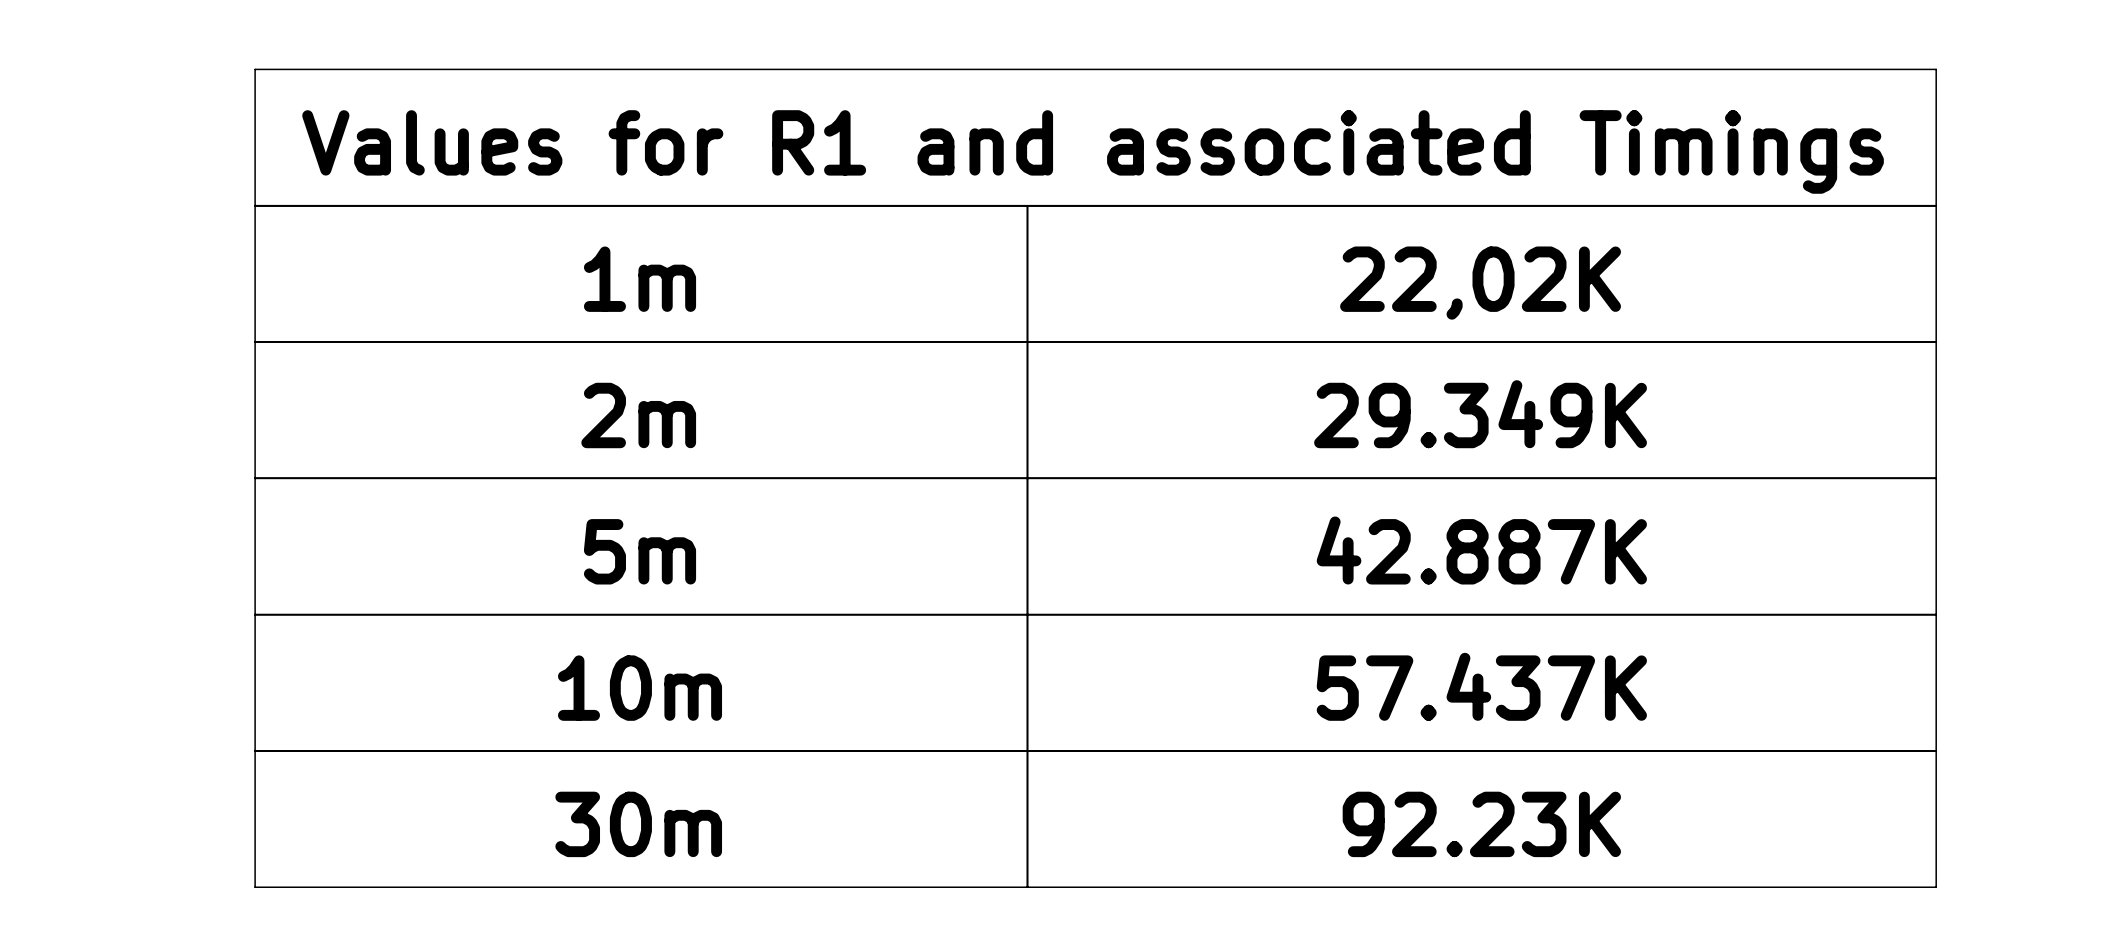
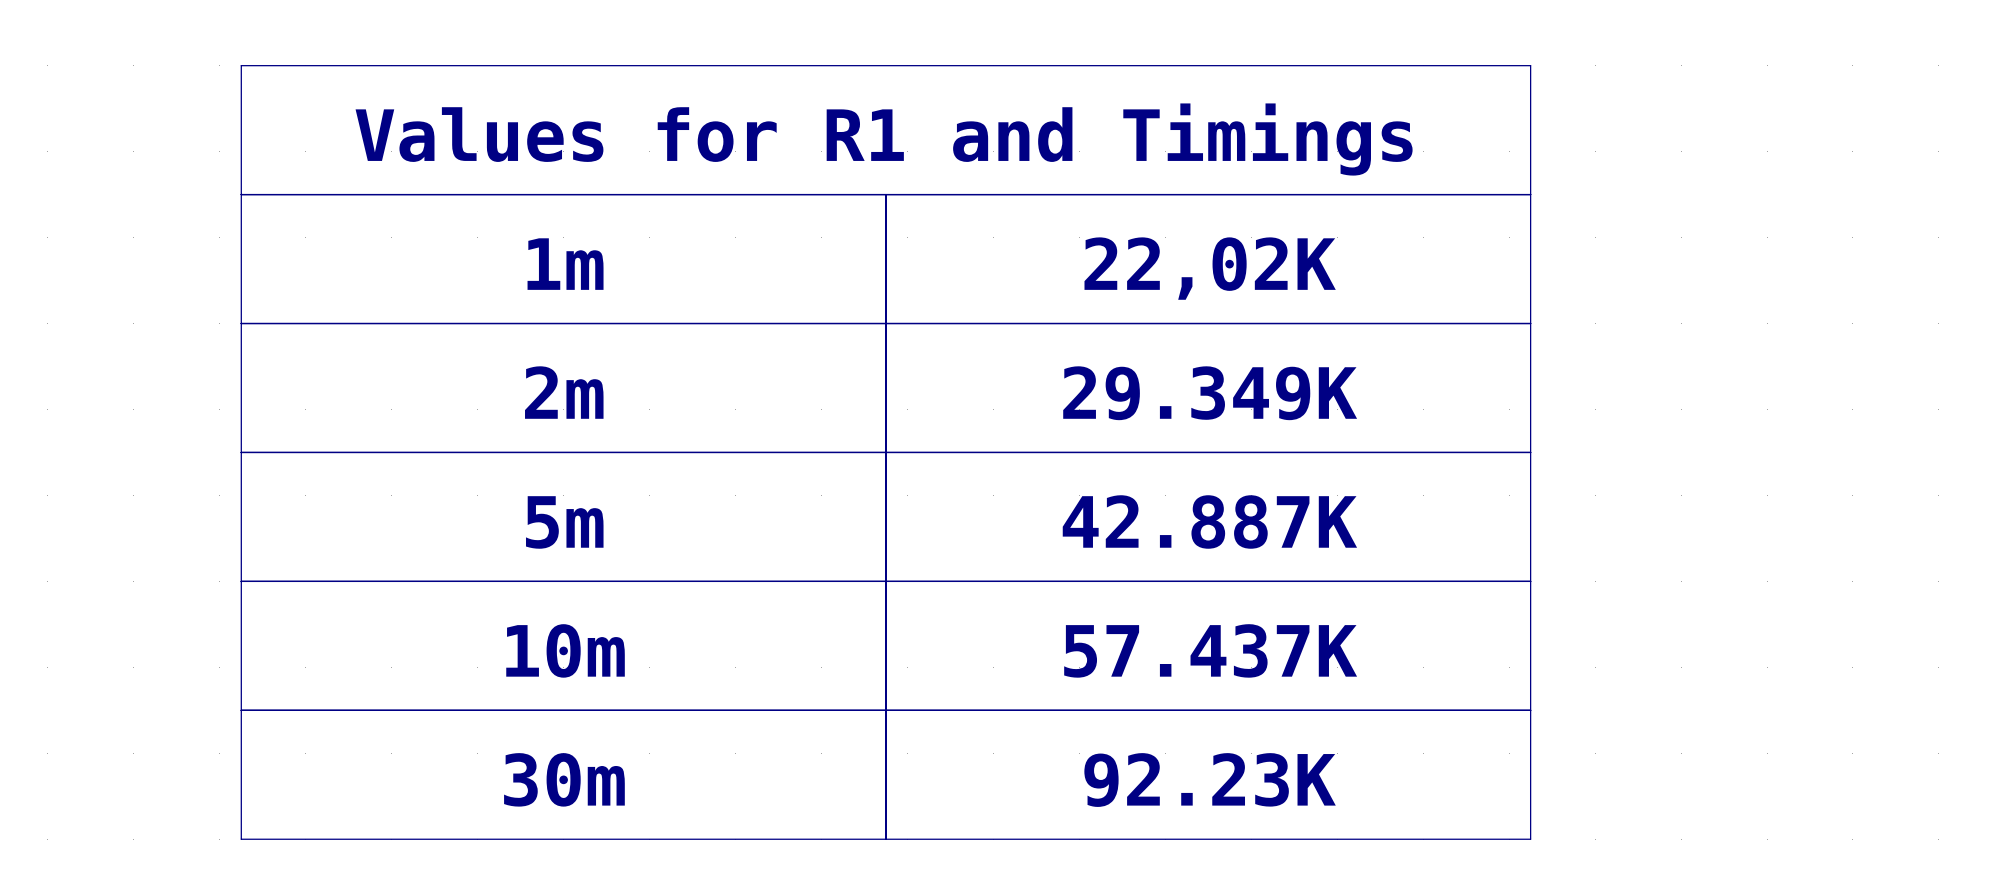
line: (1618, 69) (1936, 69) (1936, 887) (1618, 887) -> (1530, 65) (1530, 839)
text: Values for R1 and associated Timings (1093, 151) -> Values for R1 and Timings (884, 139)
line: (1027, 205) (1027, 887) -> (885, 194) (885, 839)
line: (1618, 205) (1936, 205) -> none
text position: 1m (640, 279) -> 1m (565, 264)
text position: 22,02K (1480, 283) -> 22,02K (1210, 268)
line: (1618, 342) (1936, 342) -> none
text position: 29.349K (1480, 414) -> 29.349K (1210, 393)
text position: 2m (638, 415) -> 2m (564, 392)
line: (1618, 478) (1936, 478) -> none
text position: 42.887K (1481, 550) -> 42.887K (1209, 521)
text position: 5m (640, 551) -> 5m (564, 522)
line: (1618, 614) (1936, 614) -> none
text position: 57.437K (1481, 686) -> 57.437K (1210, 650)
text position: 10m (640, 688) -> 10m (565, 650)
line: (1618, 750) (1936, 750) -> none
text position: 30m (638, 824) -> 30m (564, 779)
text position: 92.23K (1481, 824) -> 92.23K (1210, 780)

